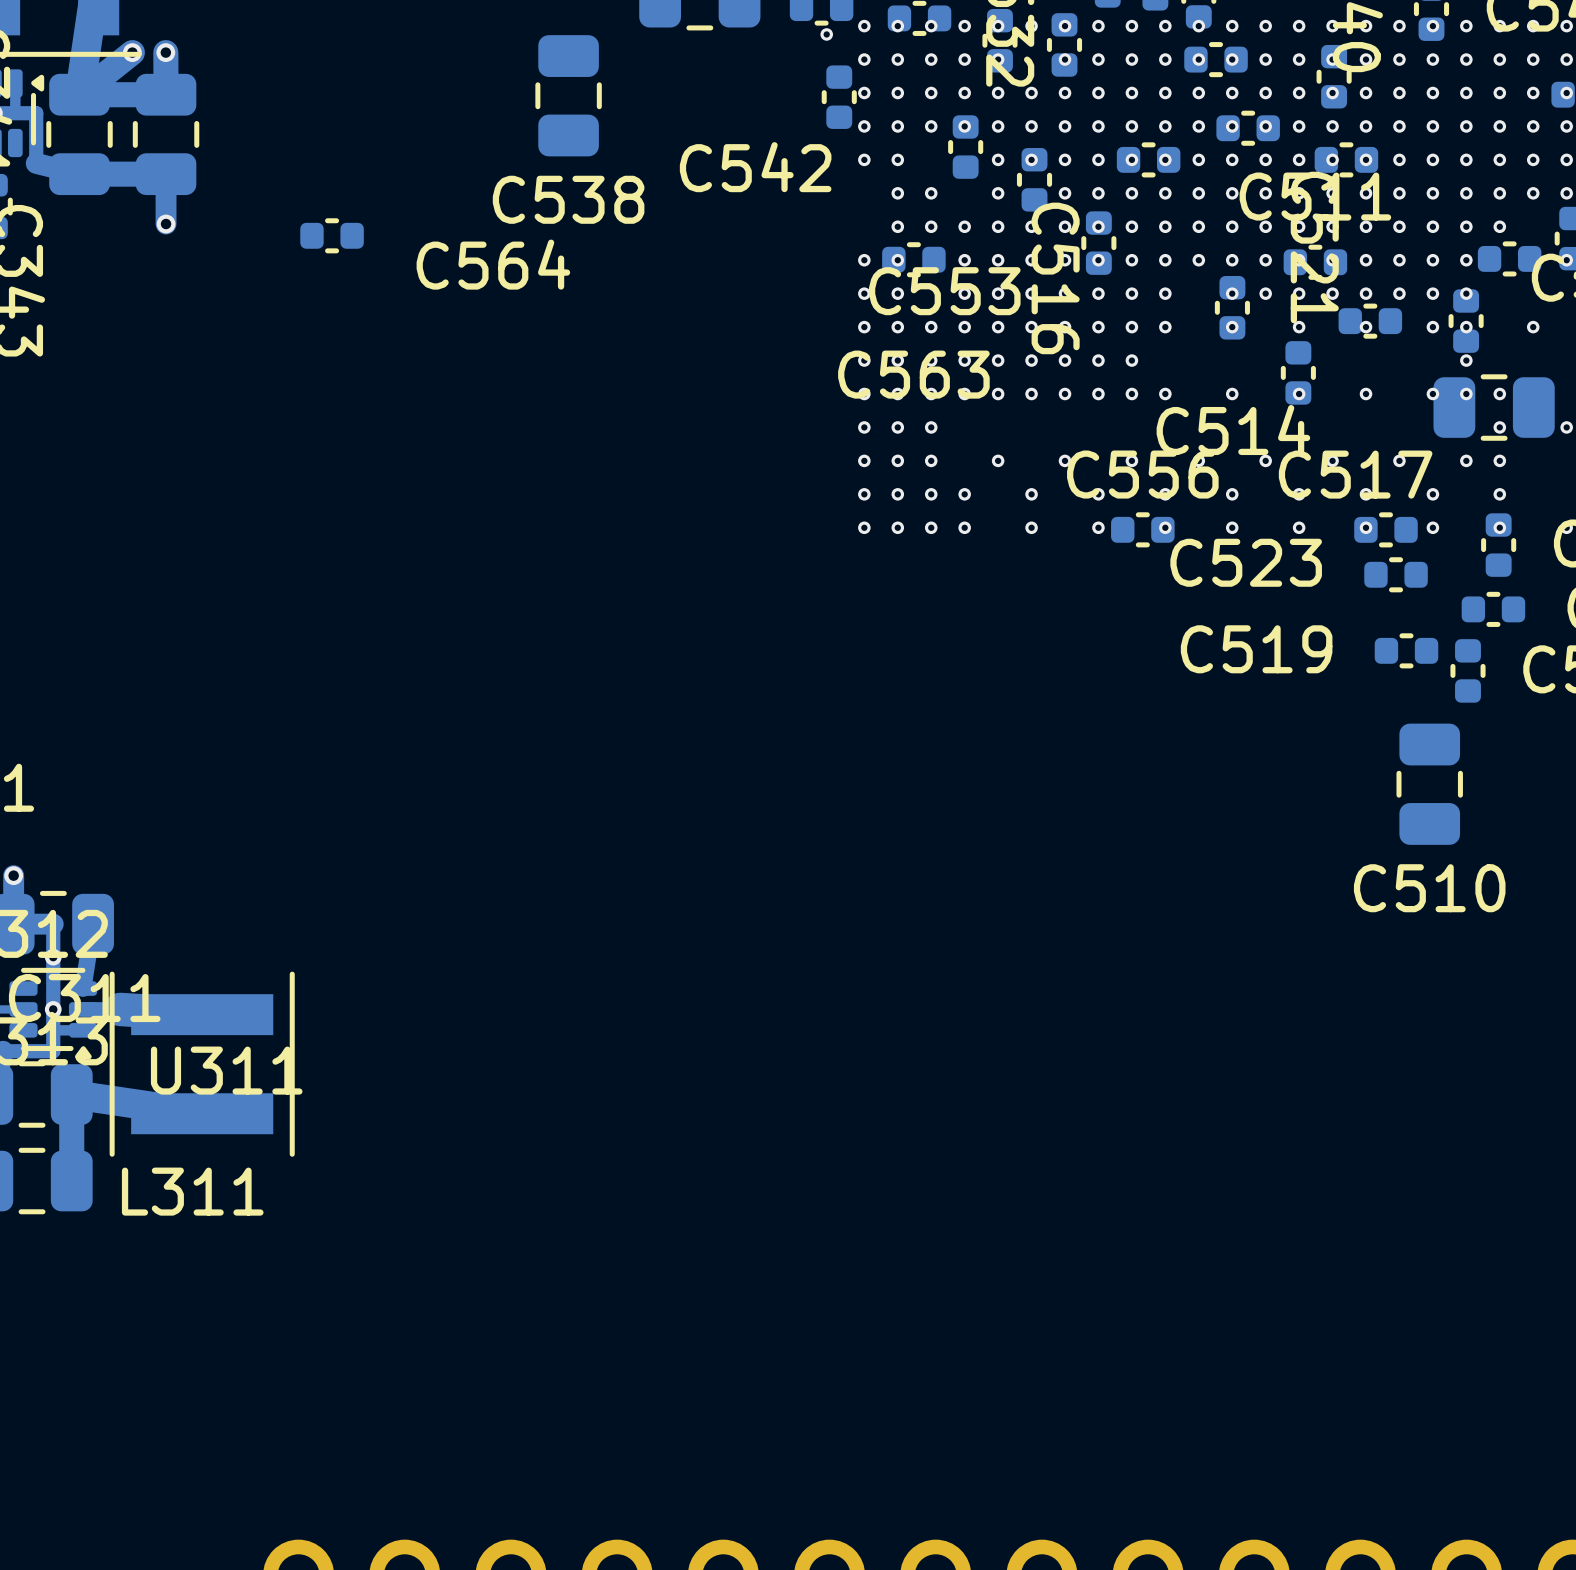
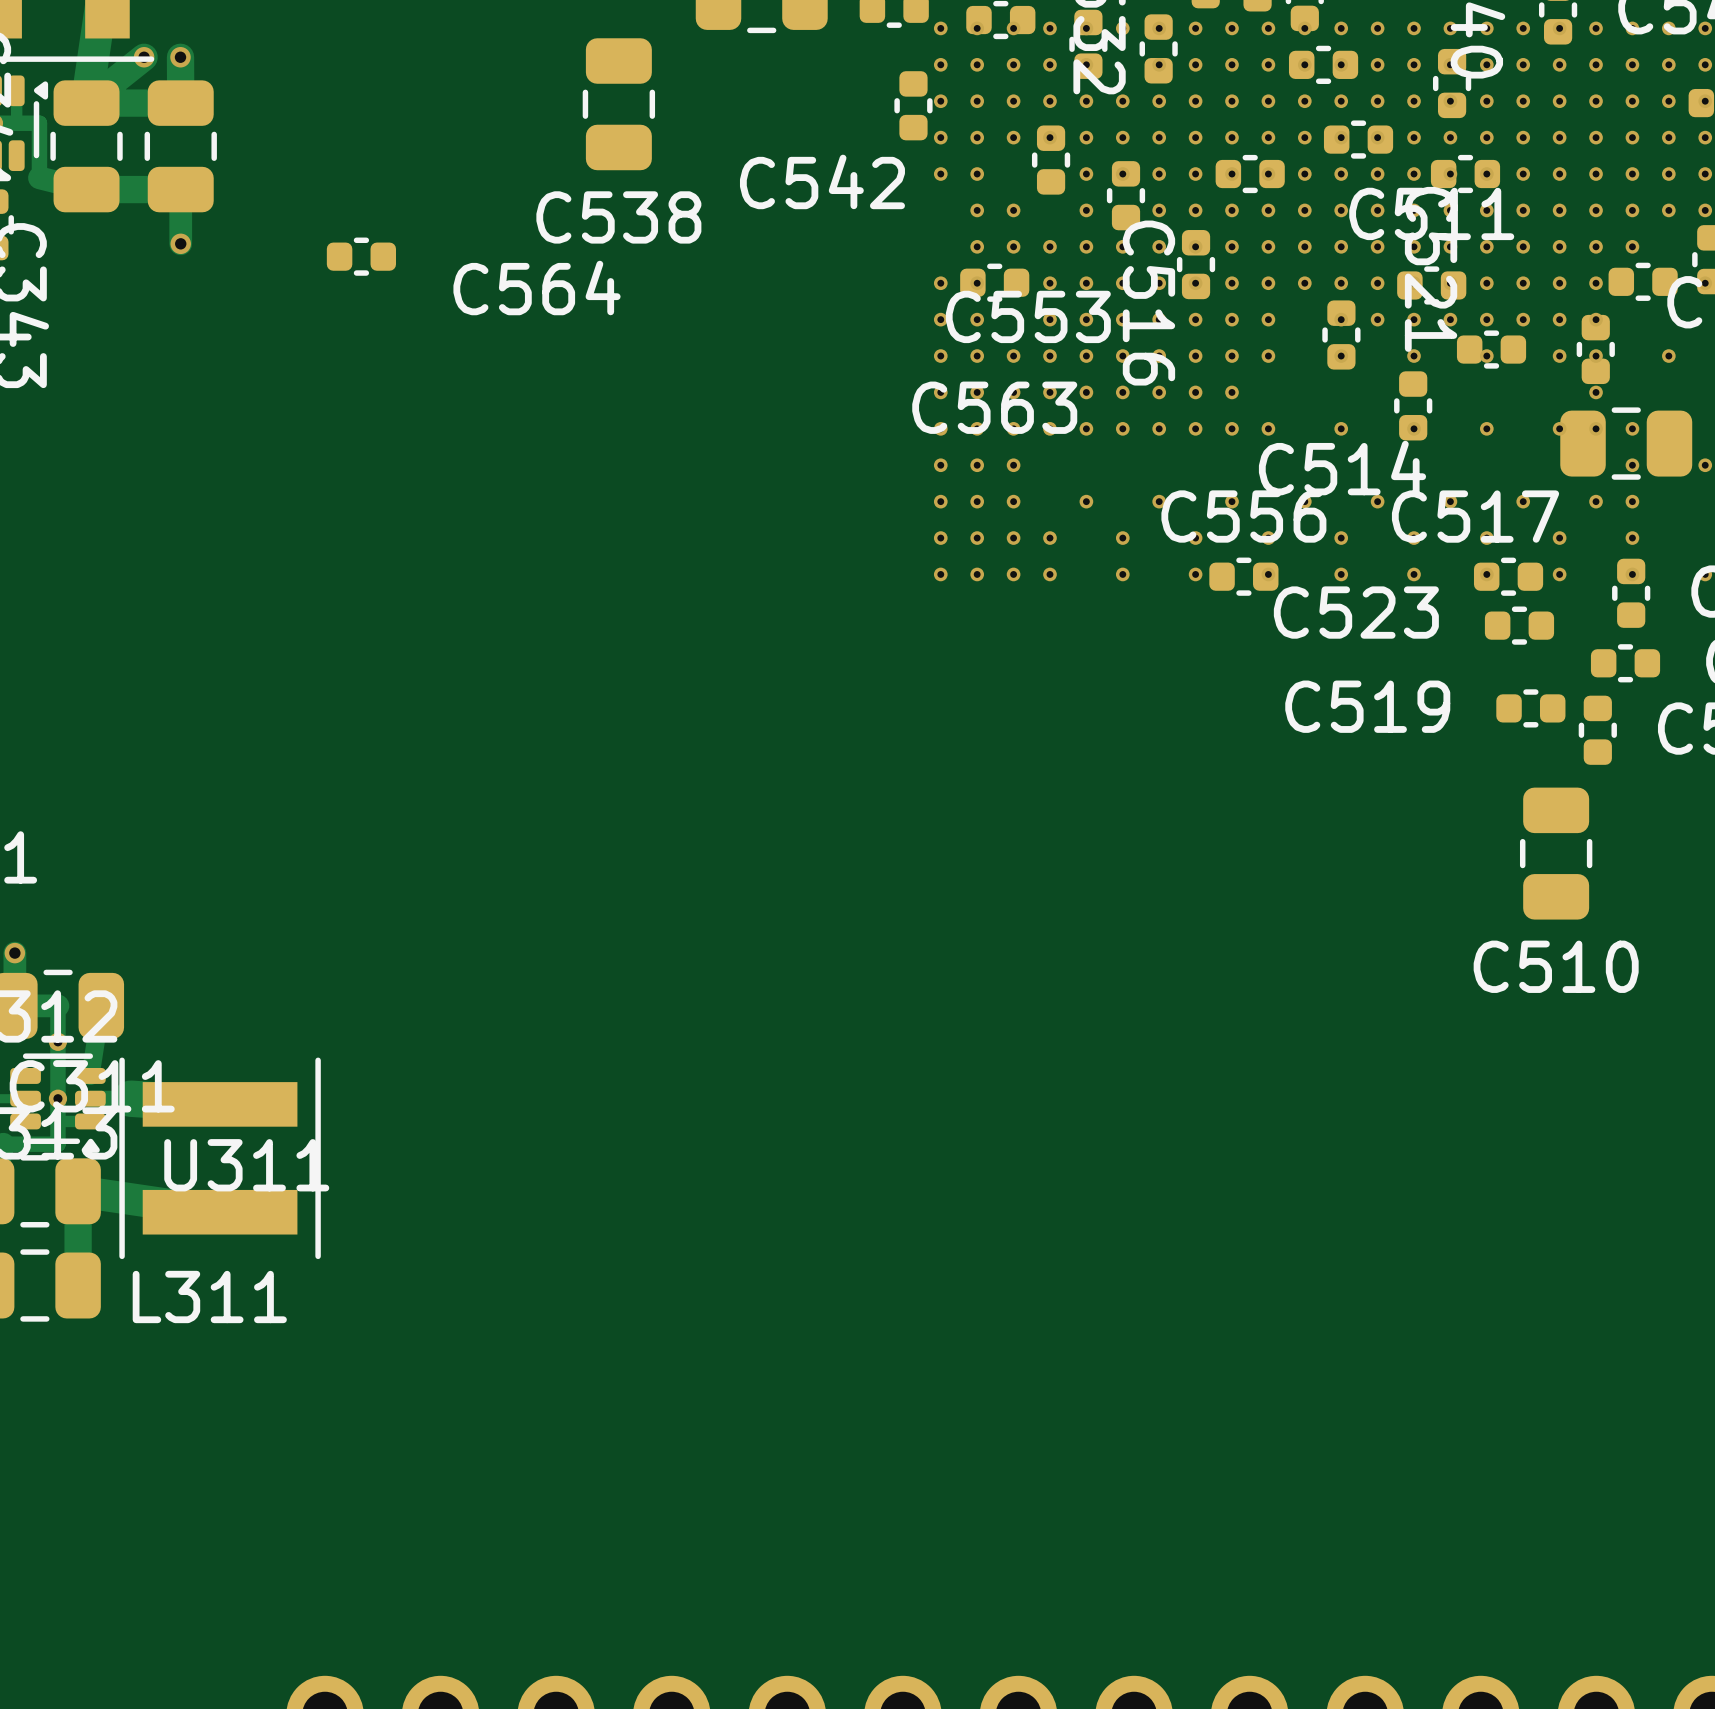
via: (826, 34) -> none

